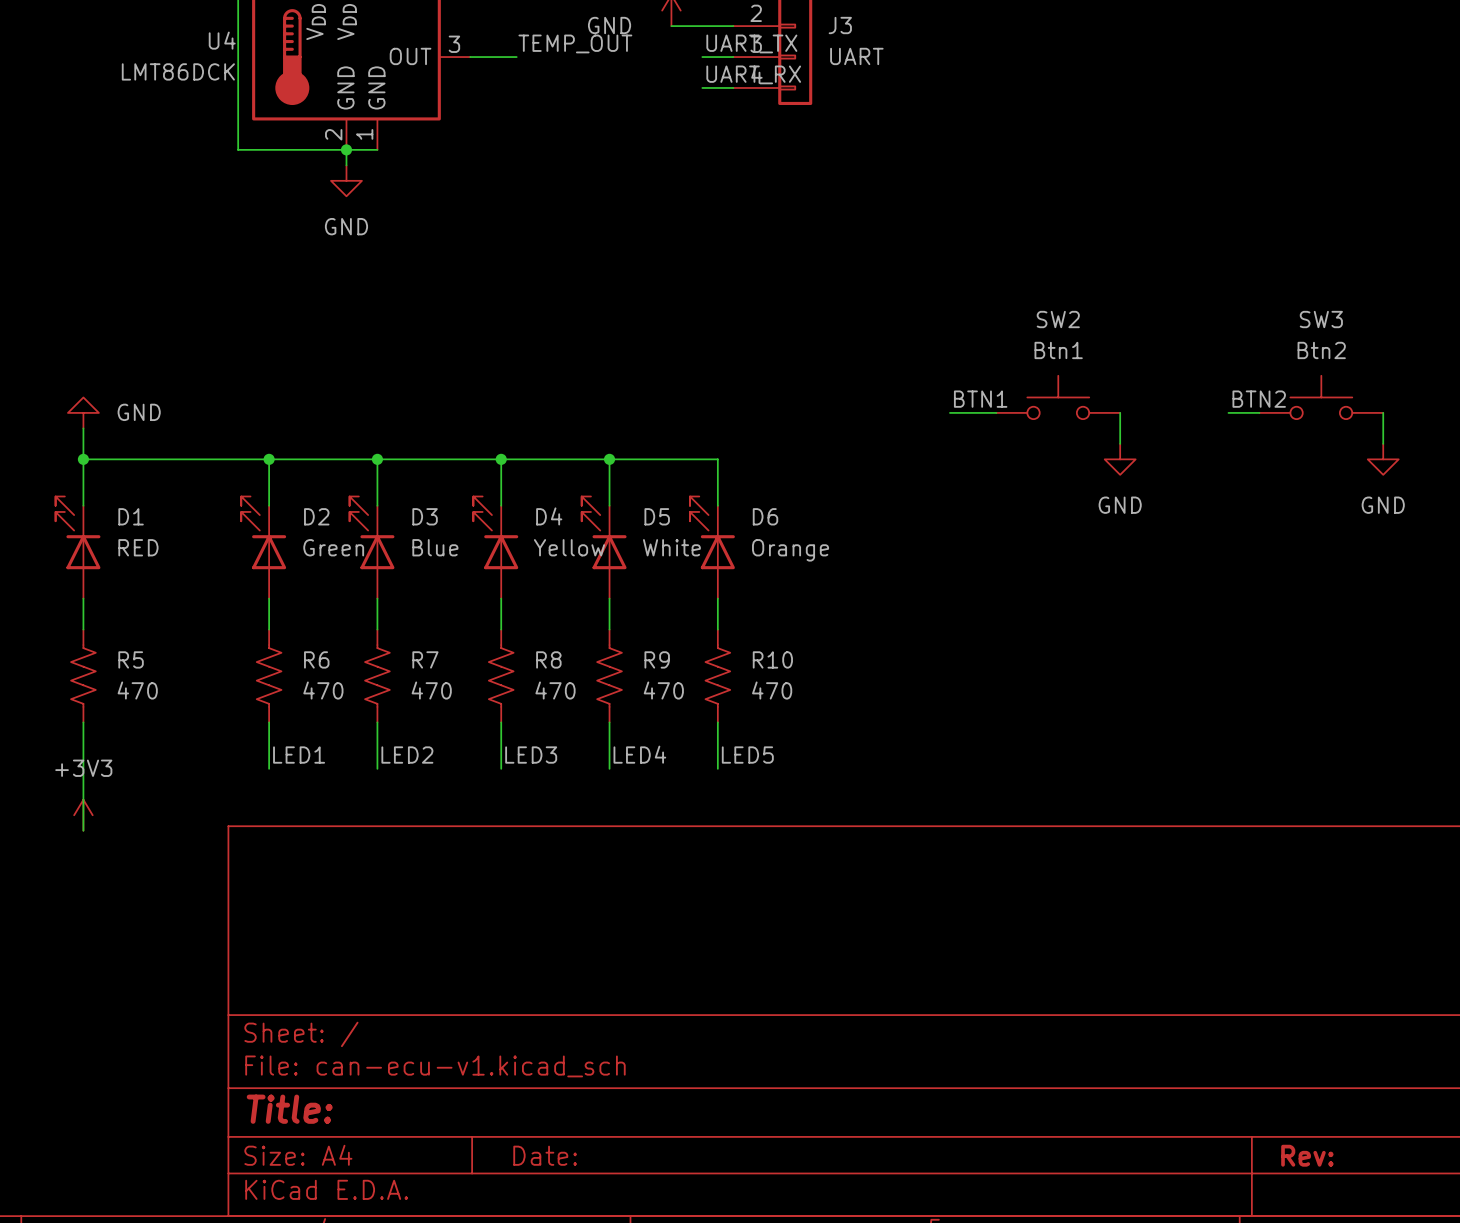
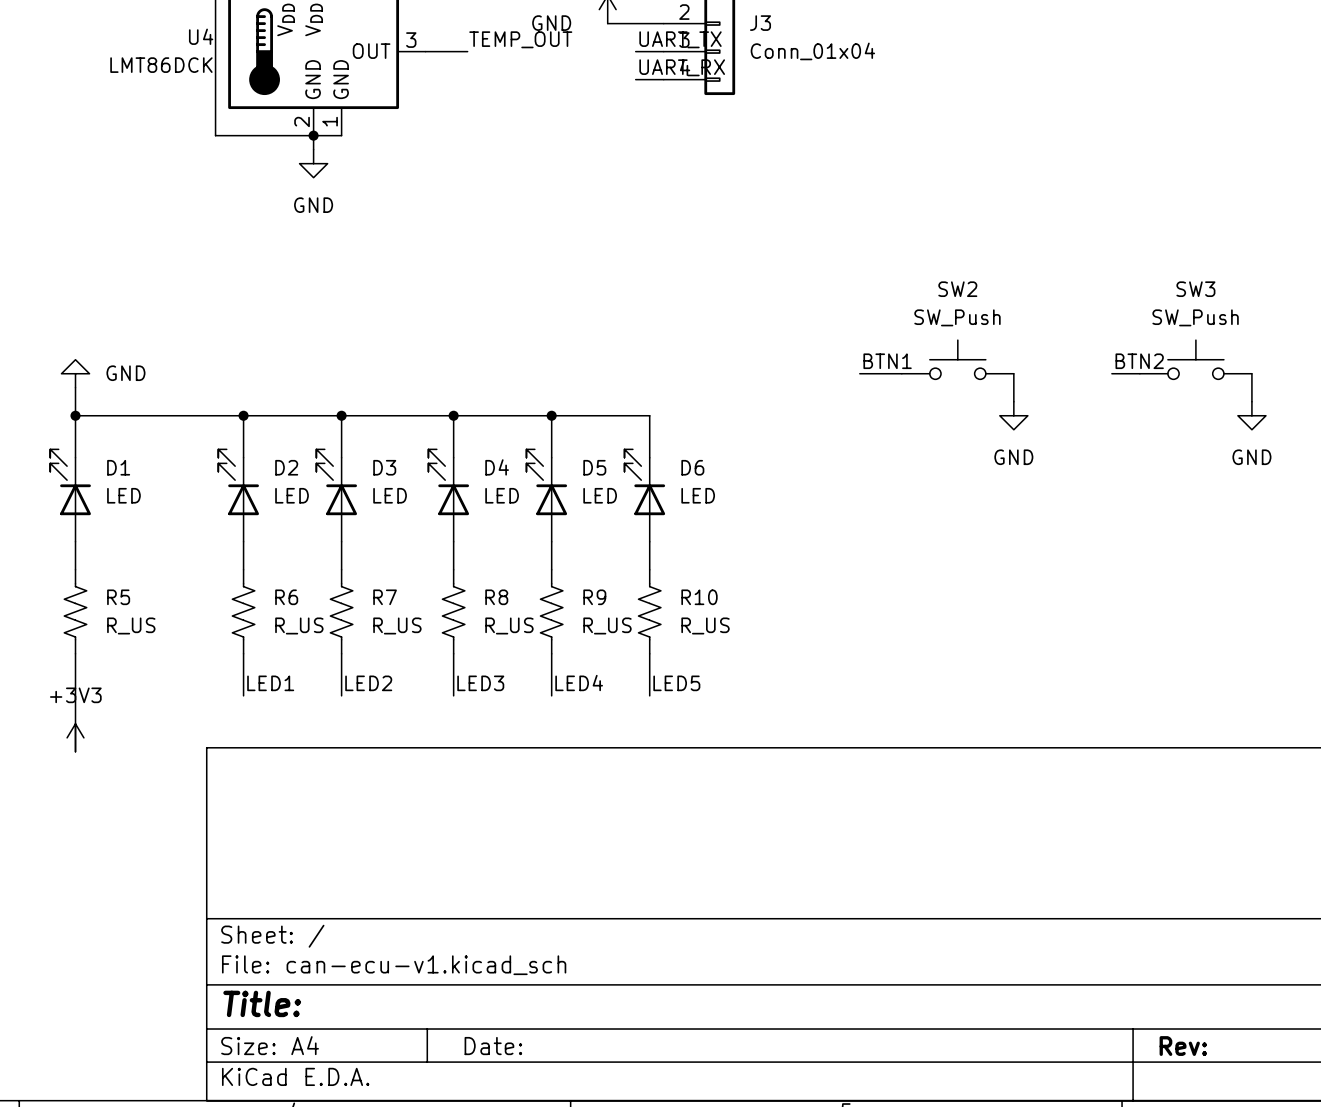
J3 value: UART (856, 56) -> Conn_01x04 (812, 51)
SW2 value: Btn1 (1058, 350) -> SW_Push (957, 317)
SW3 value: Btn2 (1321, 350) -> SW_Push (1195, 317)
D1 value: RED (138, 547) -> LED (123, 495)
D2 value: Green (333, 547) -> LED (292, 495)
D3 value: Blue (435, 547) -> LED (390, 495)
D4 value: Yellow (569, 547) -> LED (502, 495)
D5 value: White (671, 547) -> LED (600, 495)
D6 value: Orange (790, 550) -> LED (698, 495)
R5 value: 470 (137, 690) -> R_US (131, 625)
R6 value: 470 (323, 690) -> R_US (299, 625)
R7 value: 470 (431, 690) -> R_US (397, 625)
R8 value: 470 (555, 690) -> R_US (509, 625)
R9 value: 470 (663, 690) -> R_US (607, 625)
R10 value: 470 (772, 690) -> R_US (705, 625)

